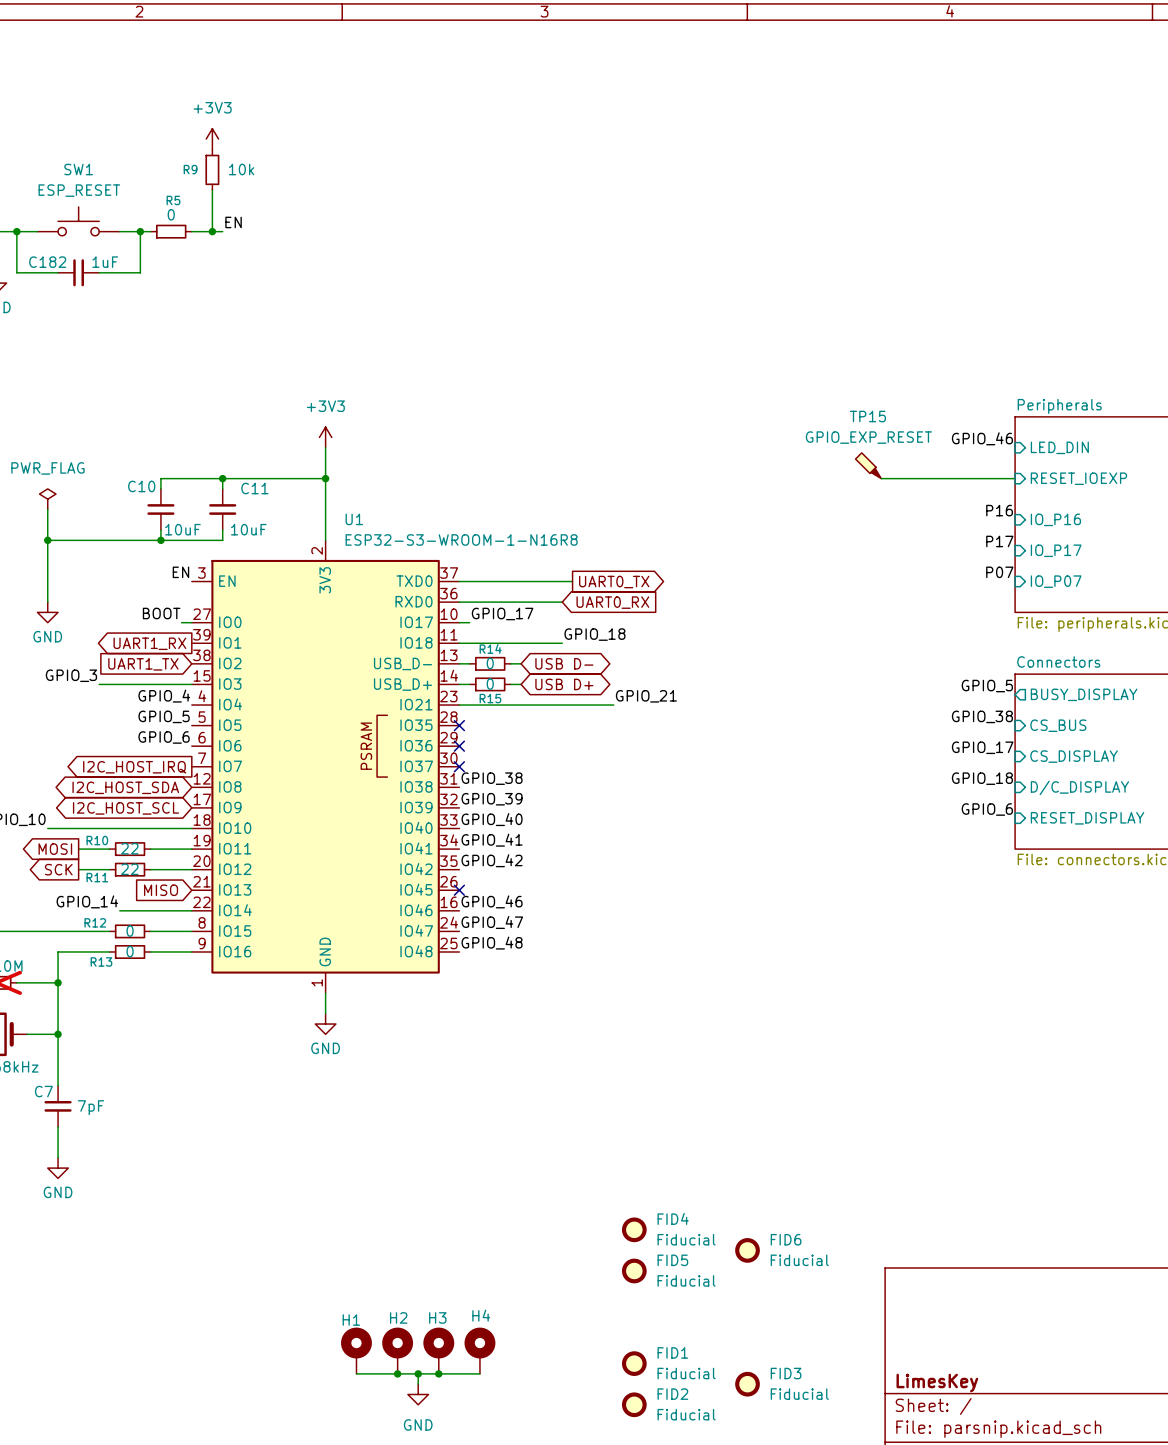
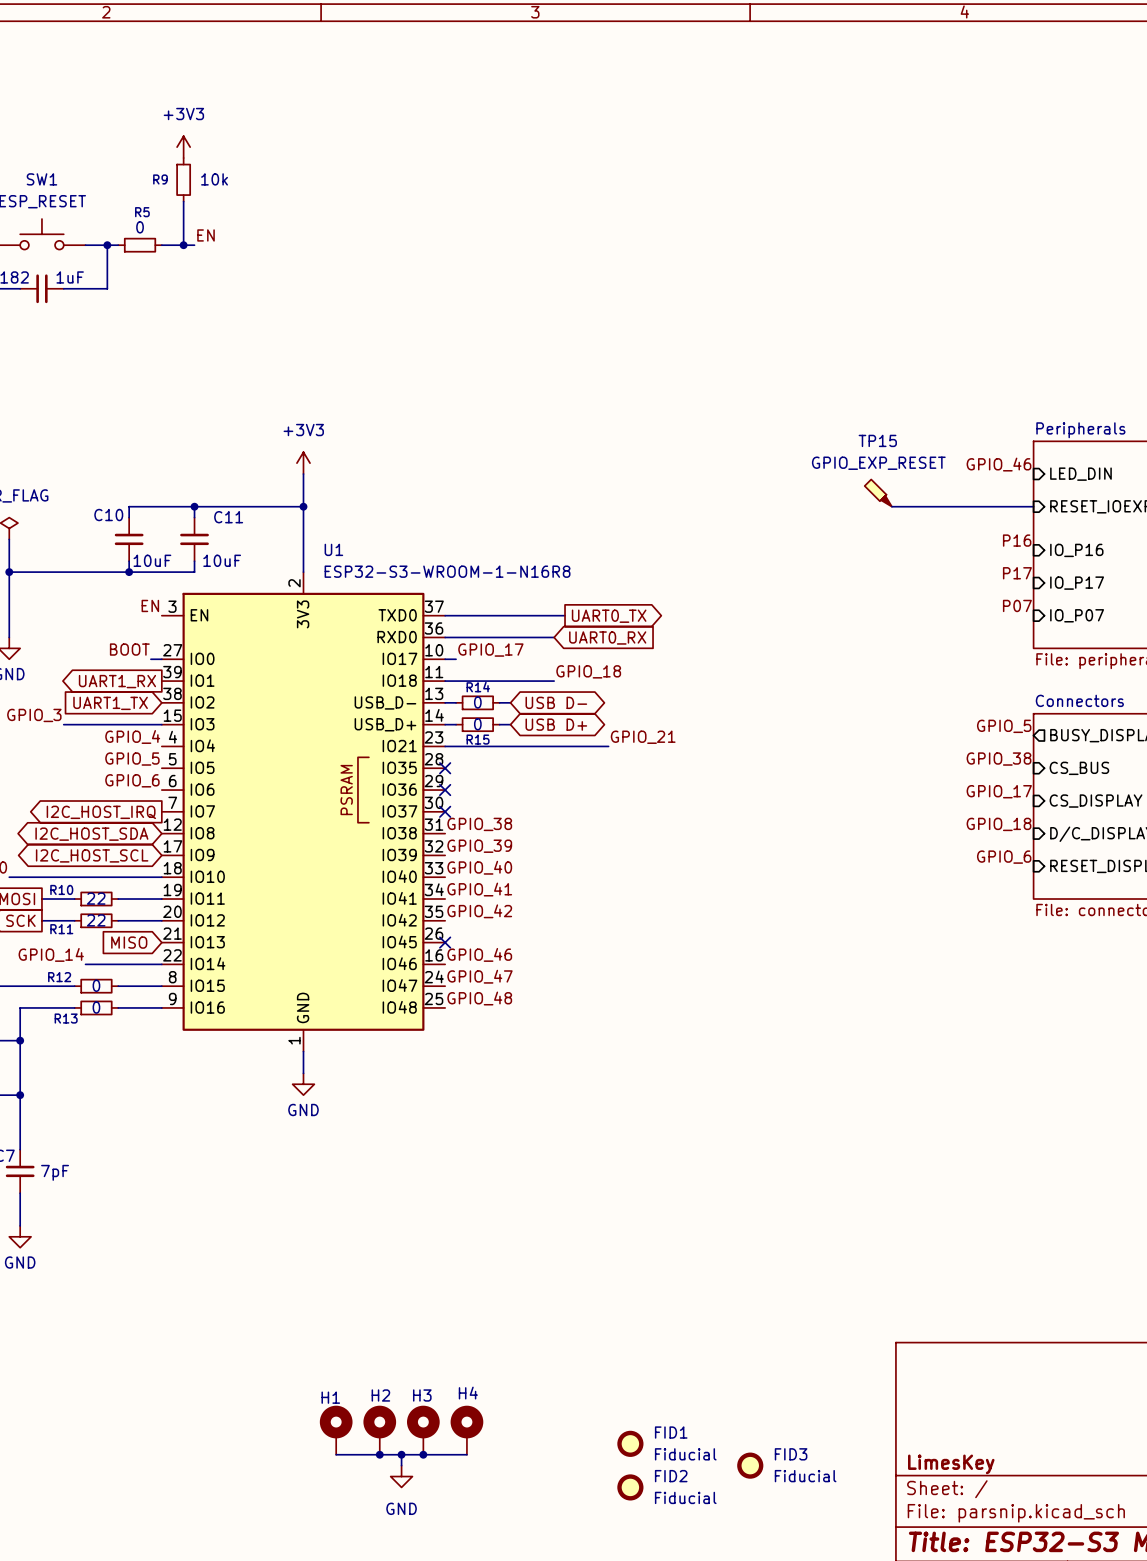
FID4: Fiducial (634, 1229) -> none
FID6: Fiducial (747, 1250) -> none
FID5: Fiducial (634, 1271) -> none

